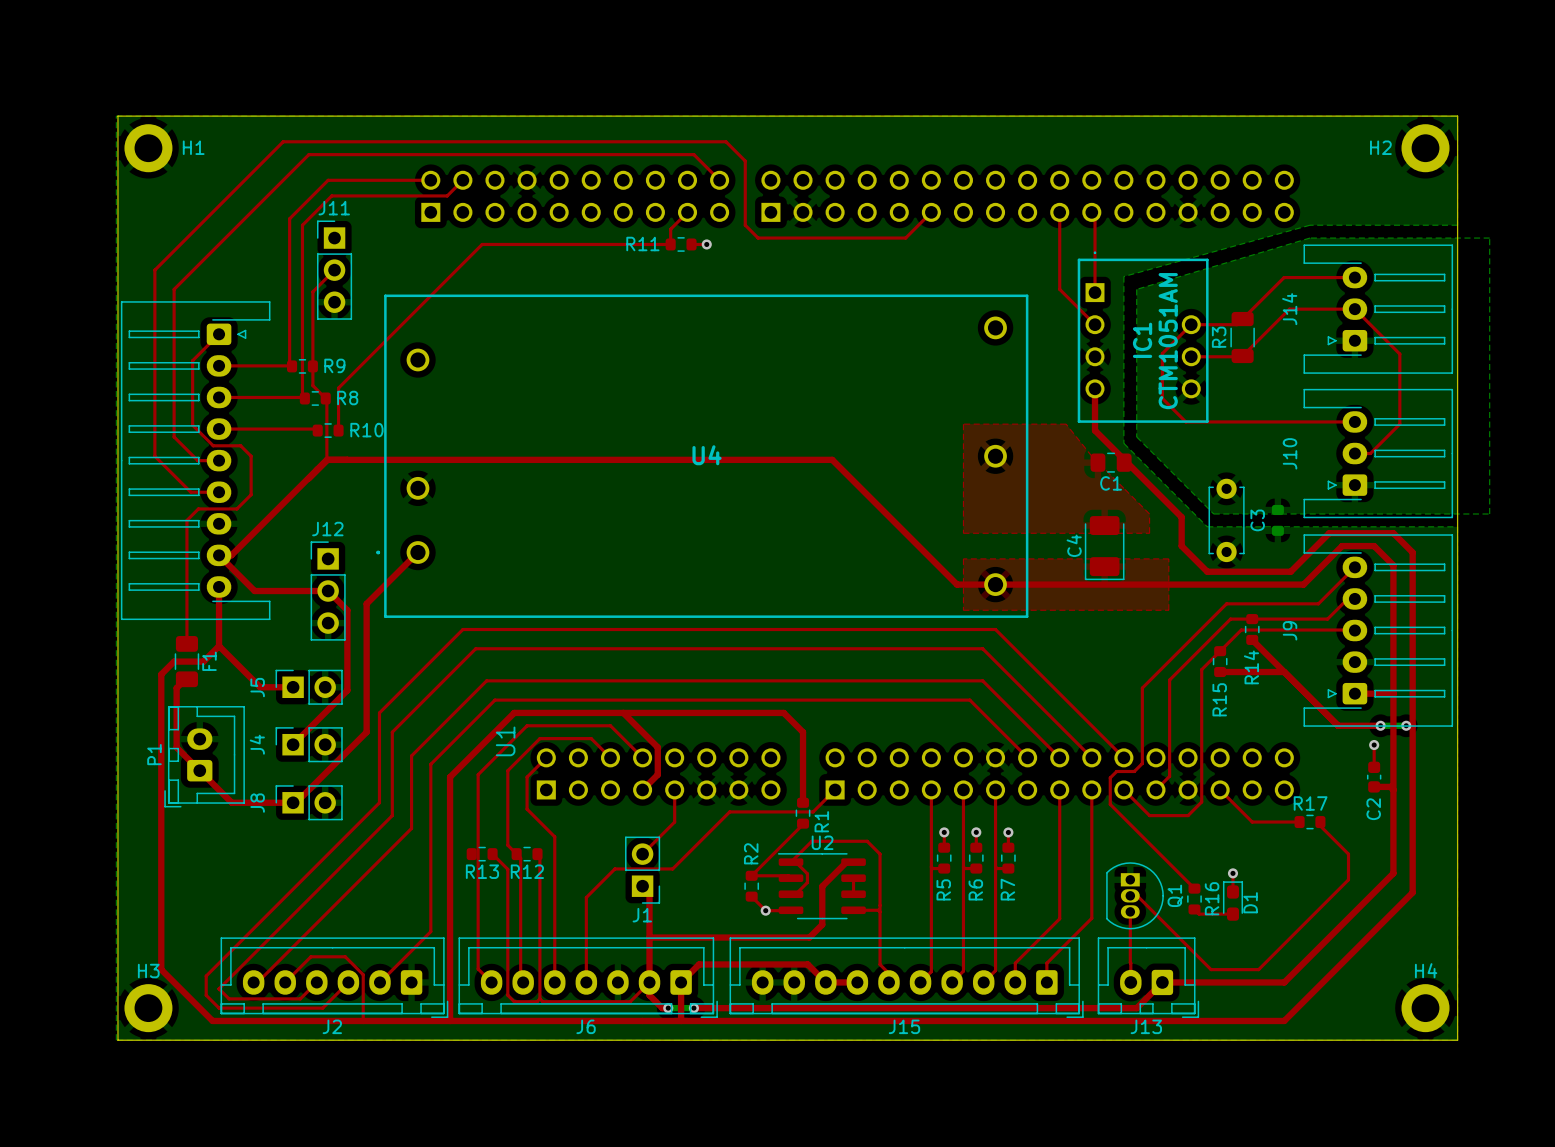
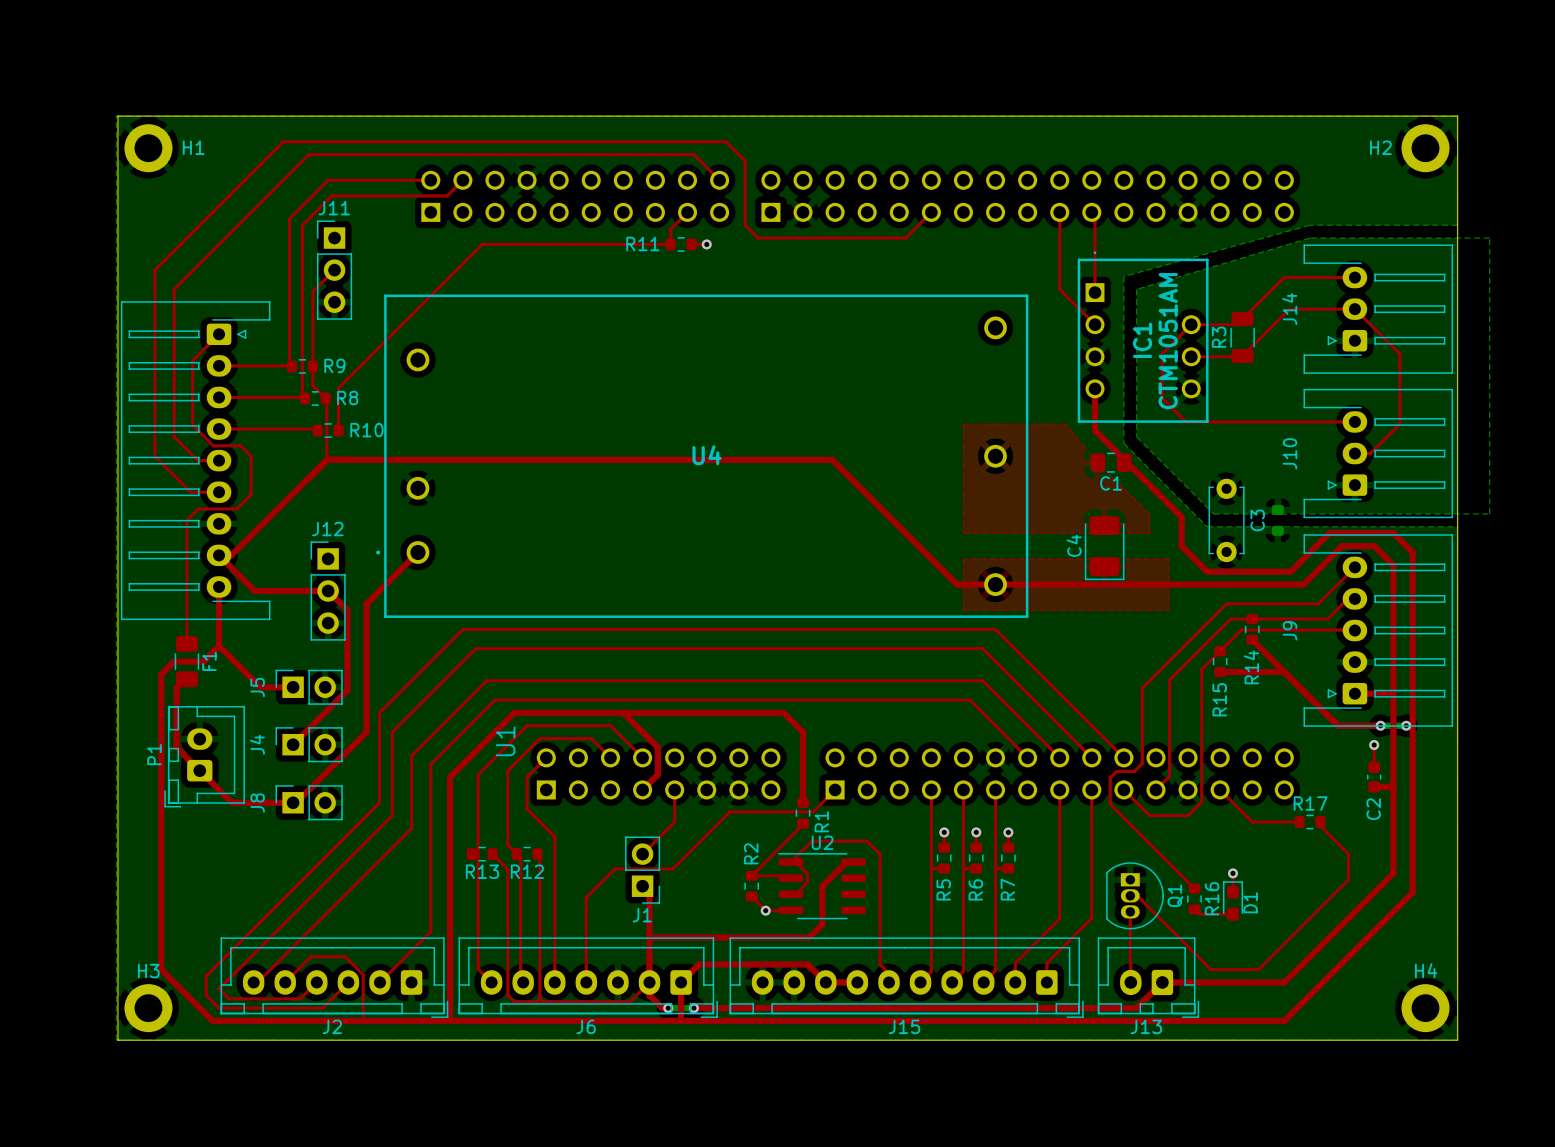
top track: (853, 878) (853, 894) -> none
top track: (853, 910) (878, 910) (880, 911) -> none

